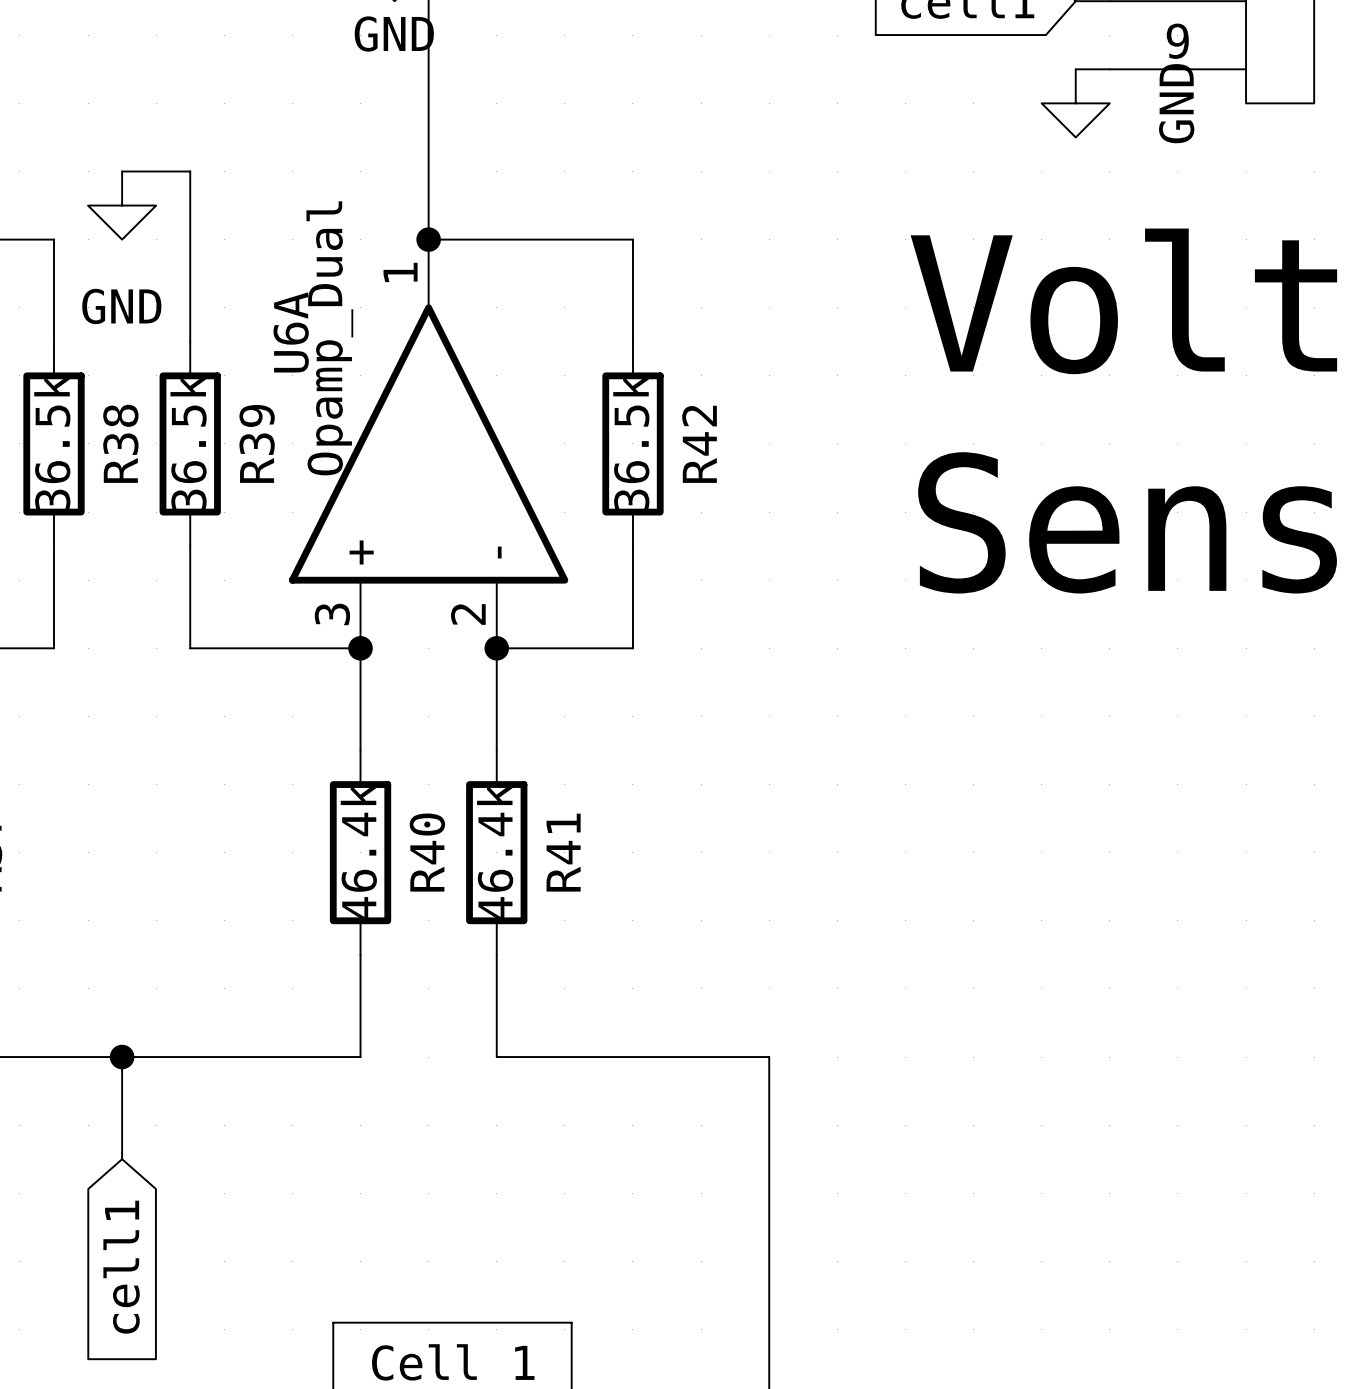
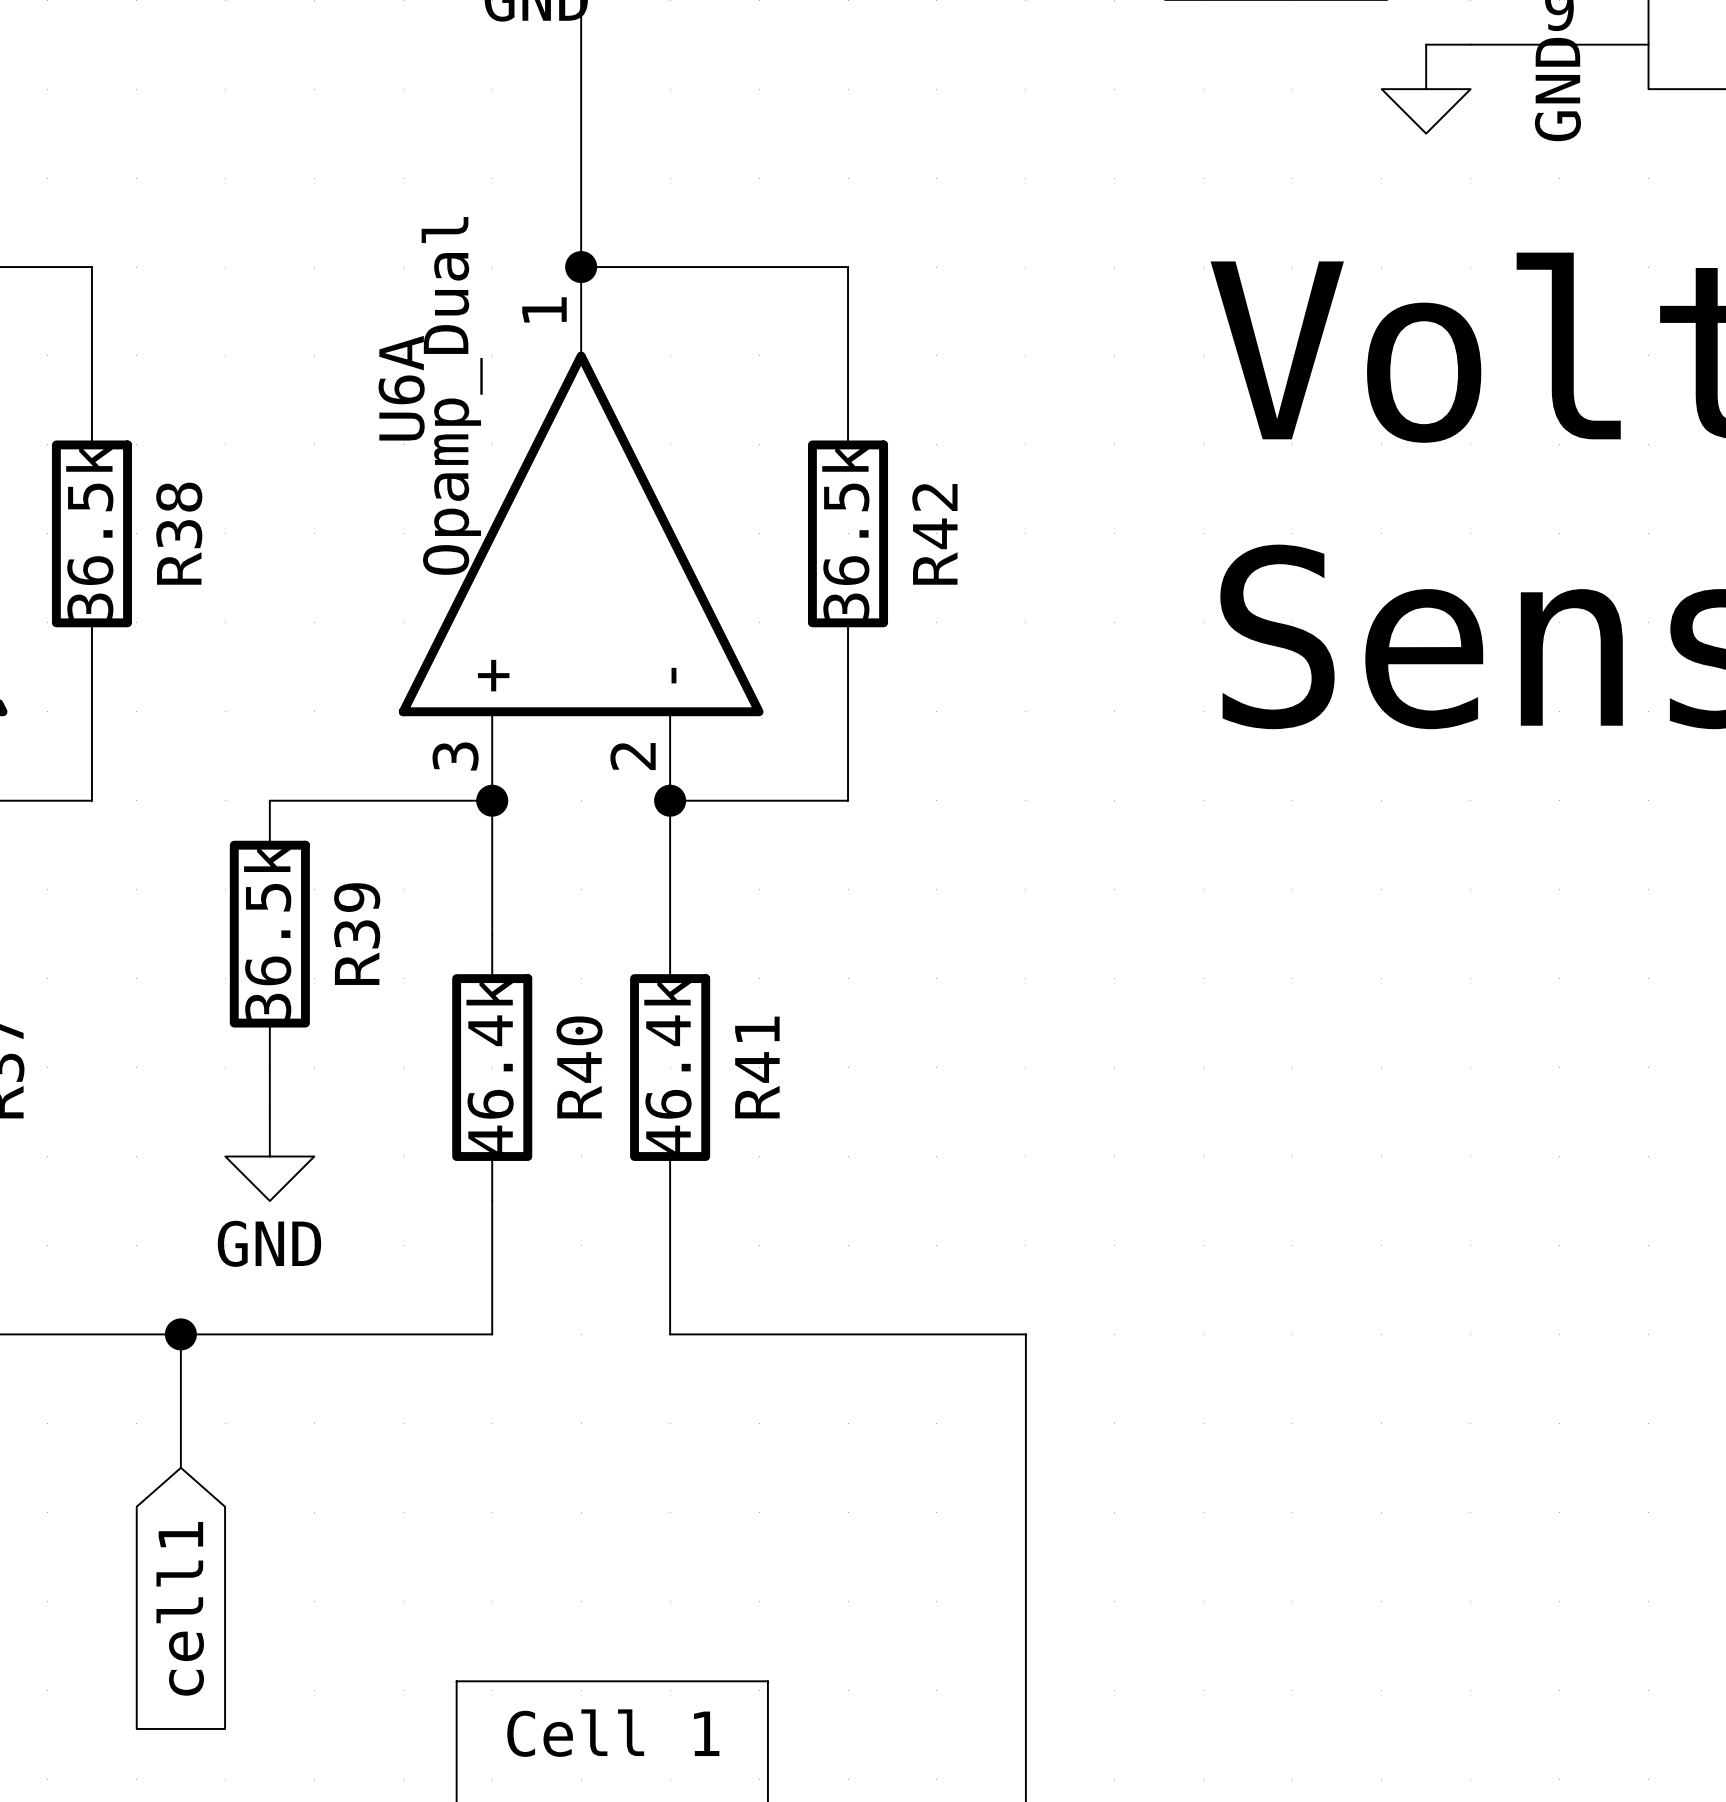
wire: (122, 171) (190, 171) (190, 341) -> none
power symbol: GND (122, 205) -> none
R39 position: (190, 443) -> (269, 934)
wire: (190, 546) (190, 648) -> none
wire: none -> (269, 1067) (269, 1112)
power symbol: none -> GND (269, 1156)

